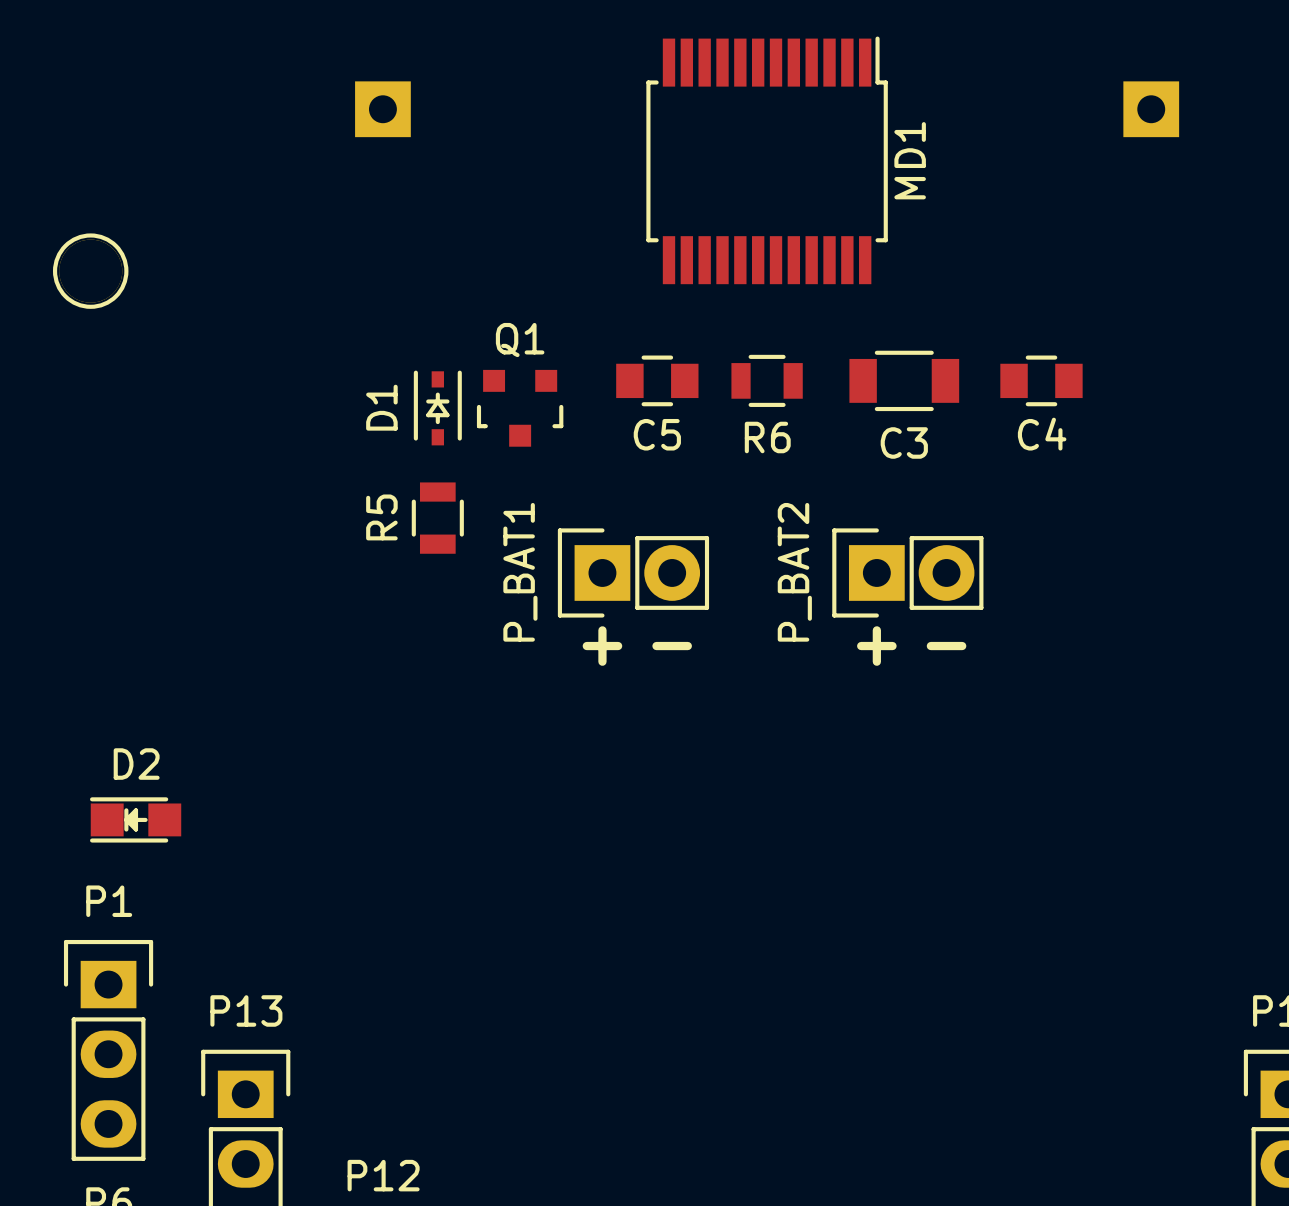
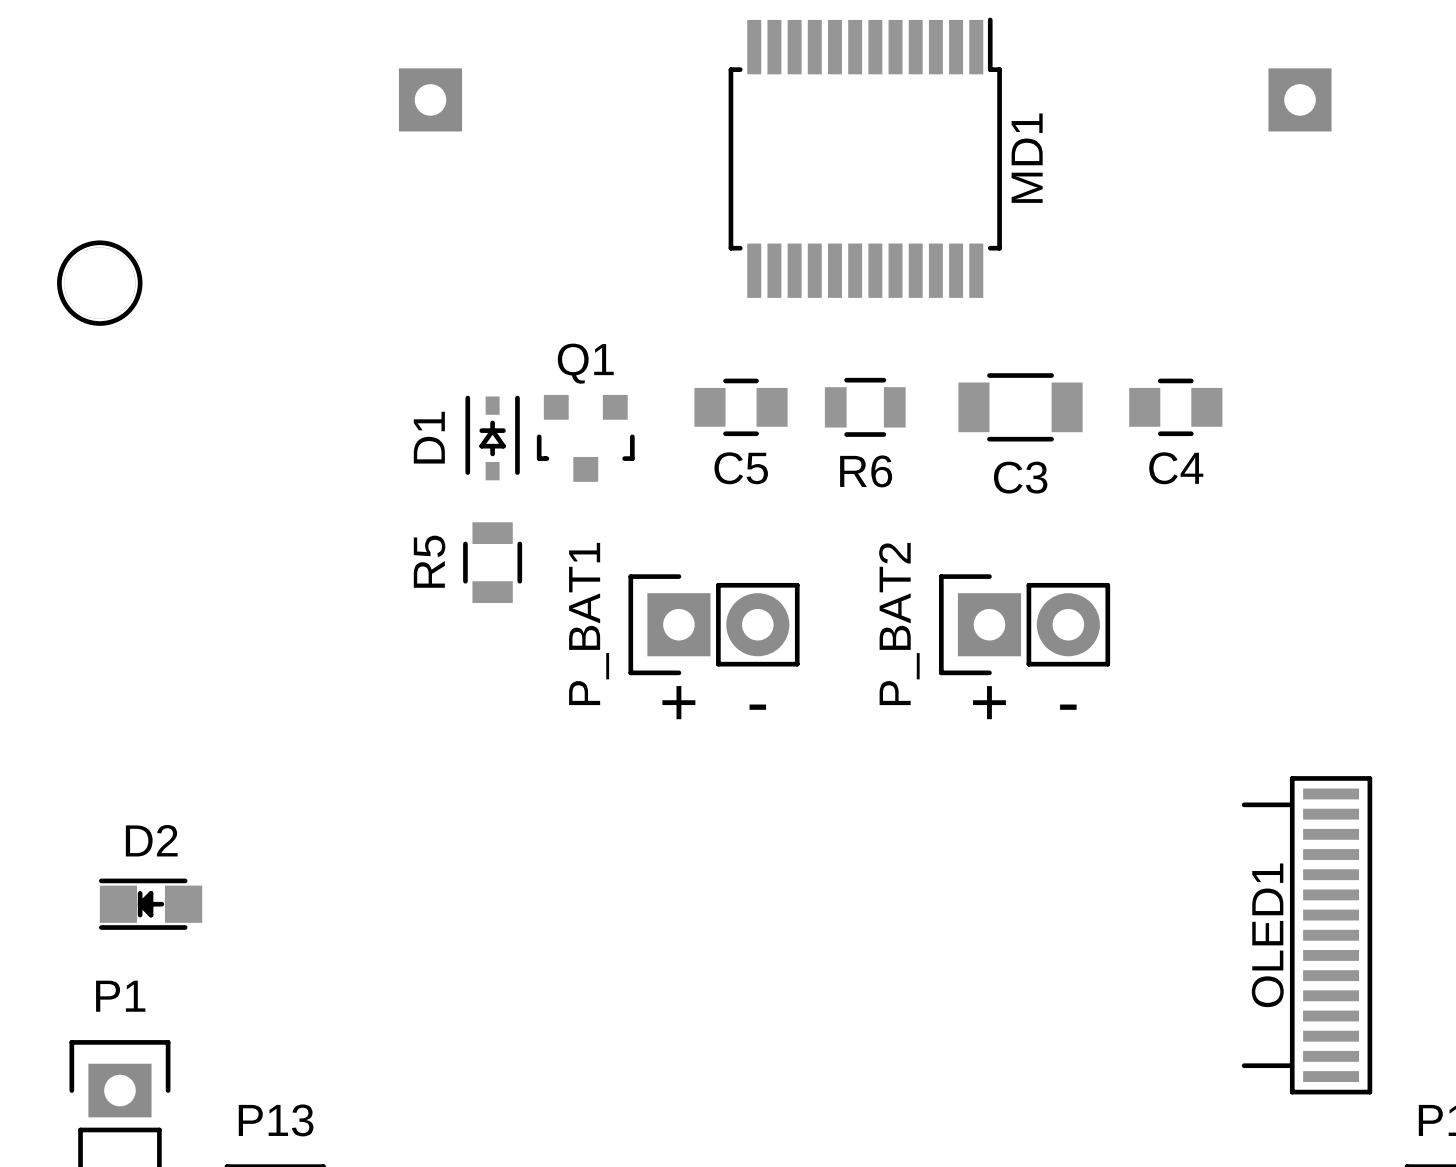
OLED1: none -> (1307, 935)

